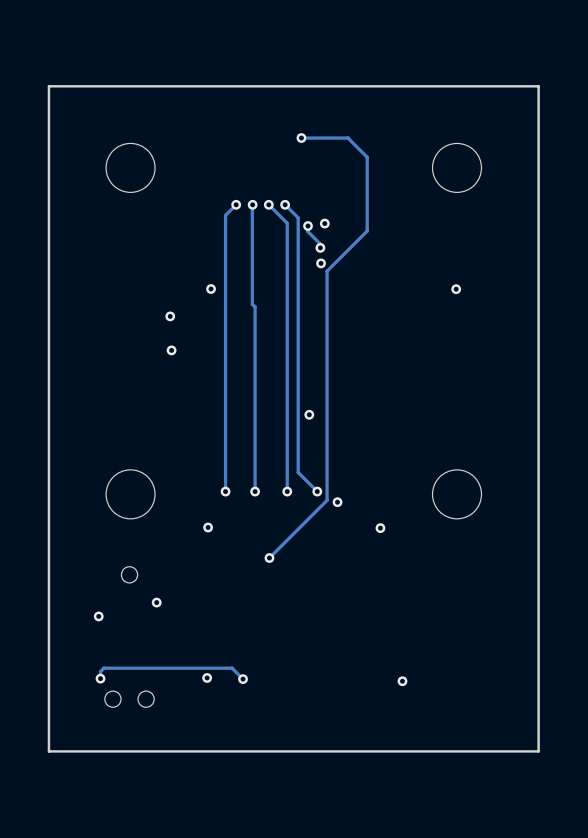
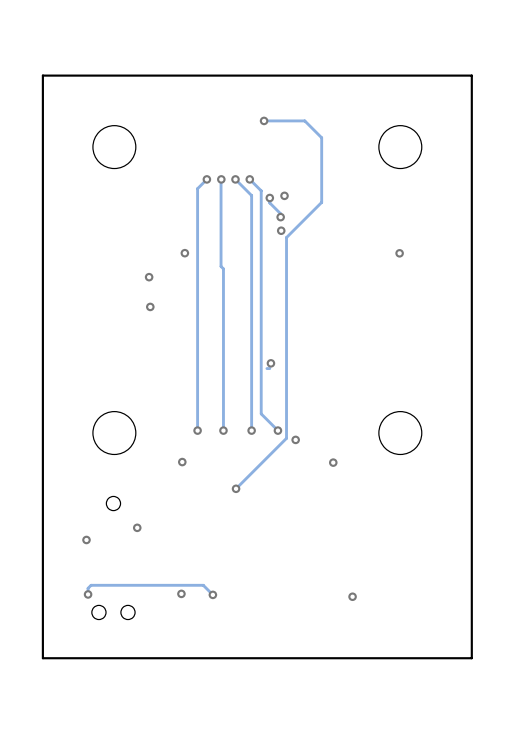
track: none -> (269, 368) (266, 368)

